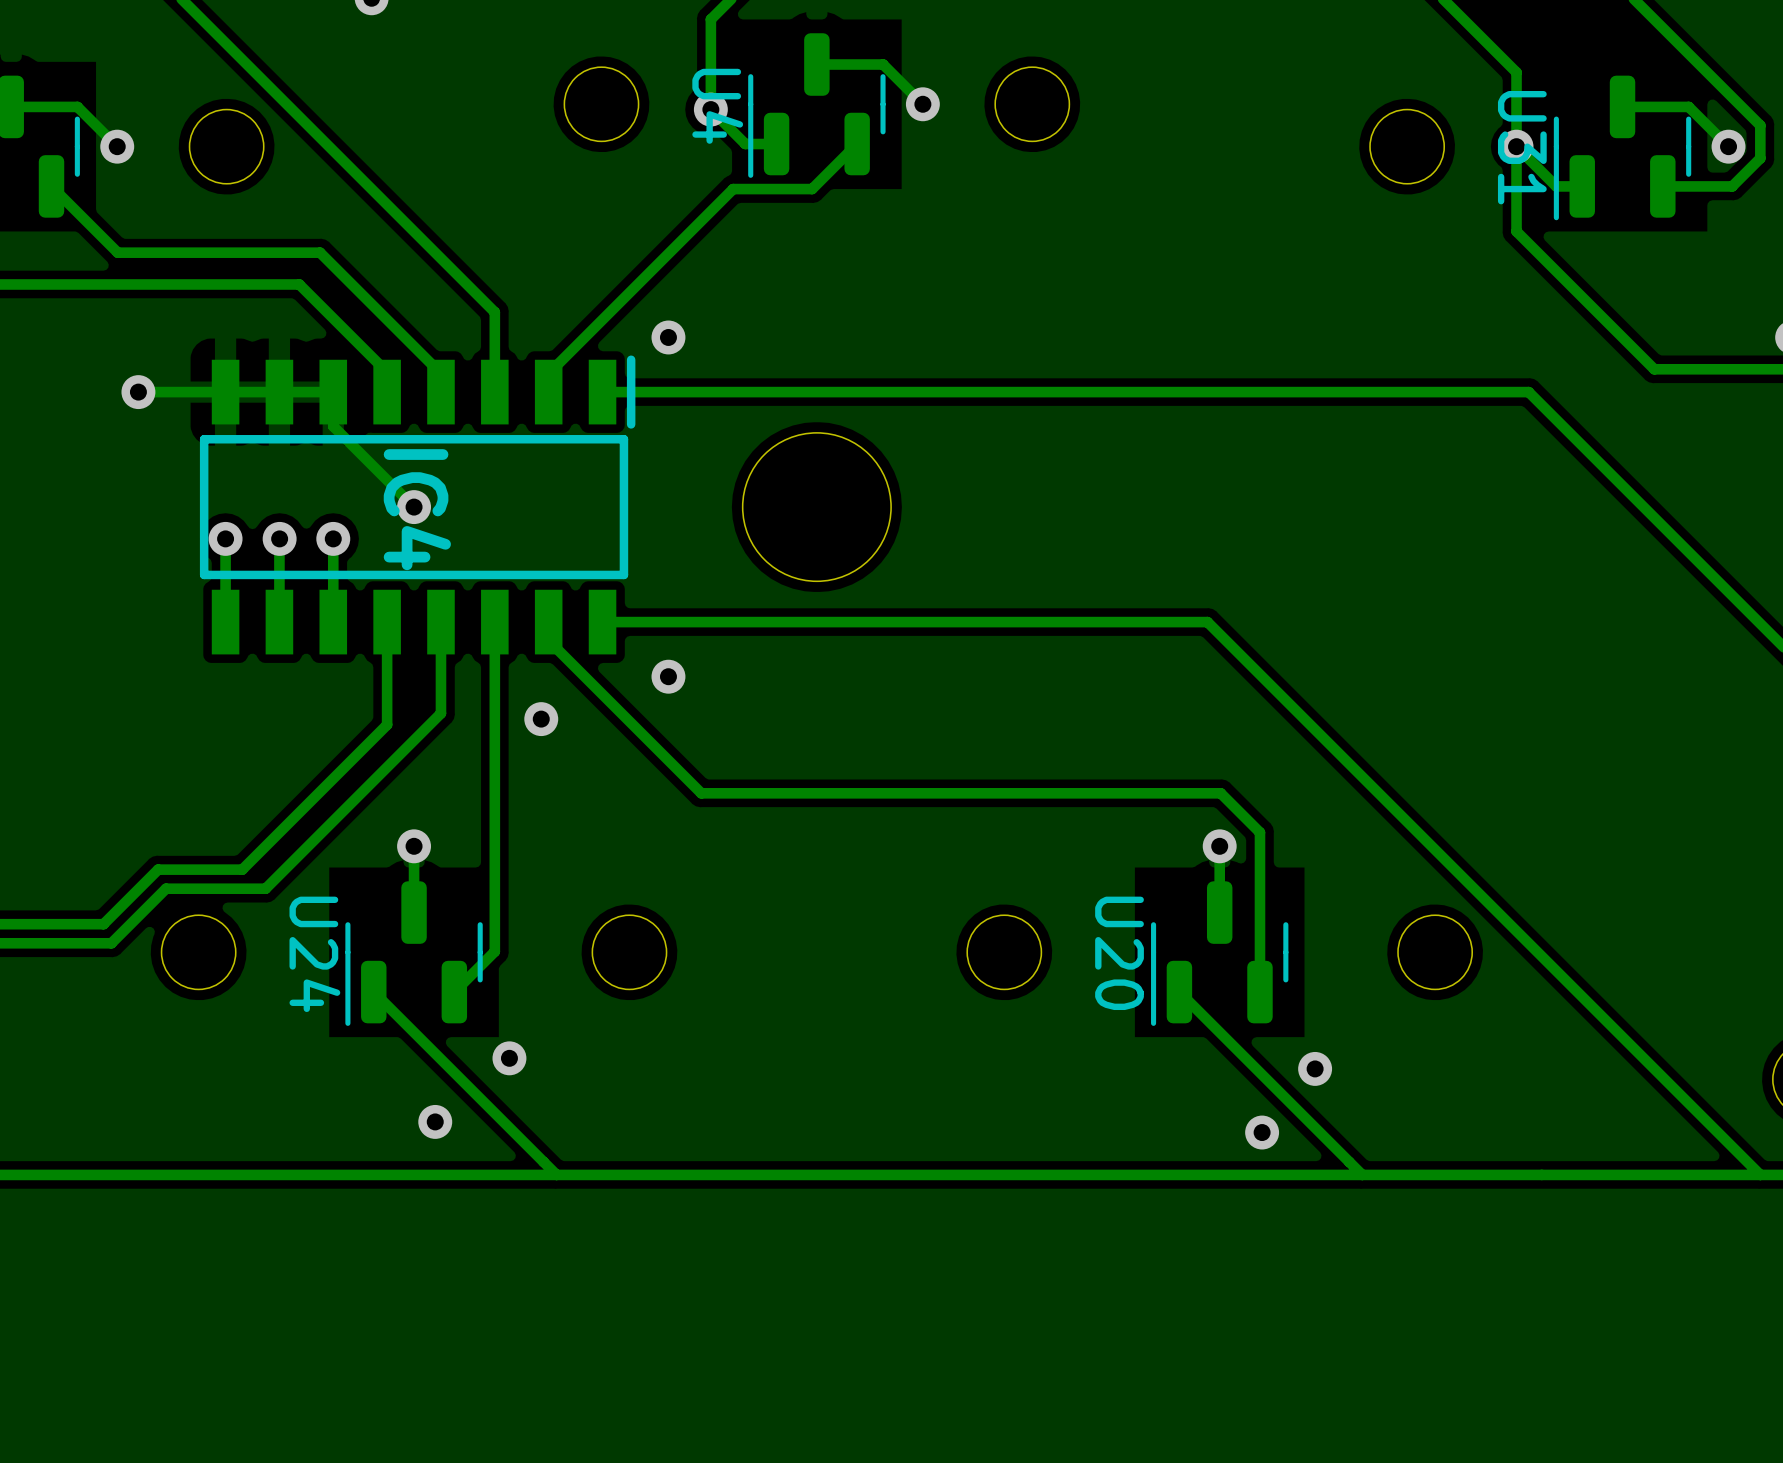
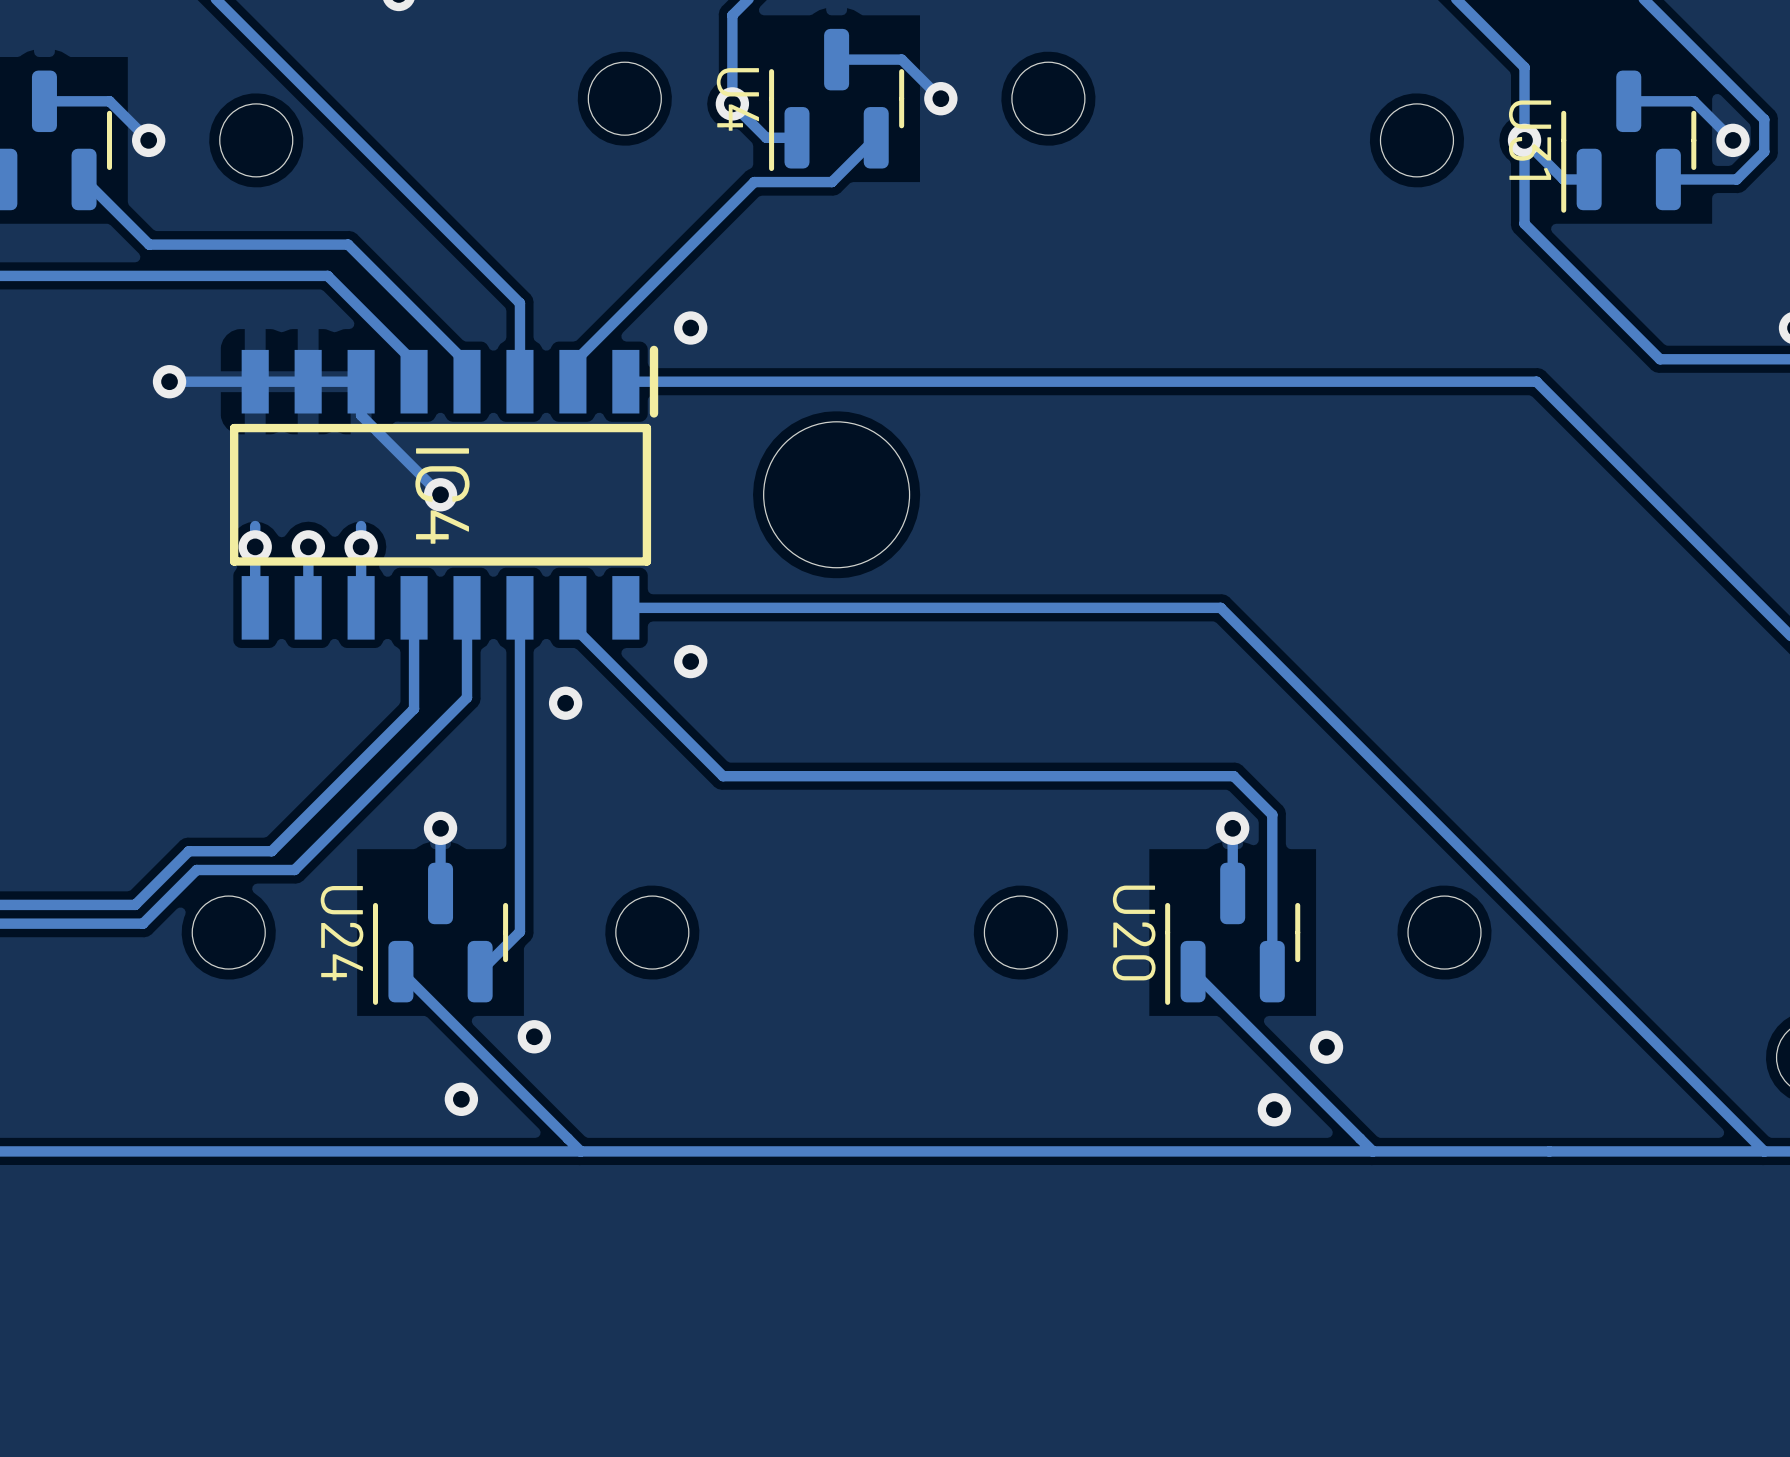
via position: (225, 538) -> (255, 546)
via position: (279, 538) -> (308, 546)
via position: (333, 538) -> (361, 546)

